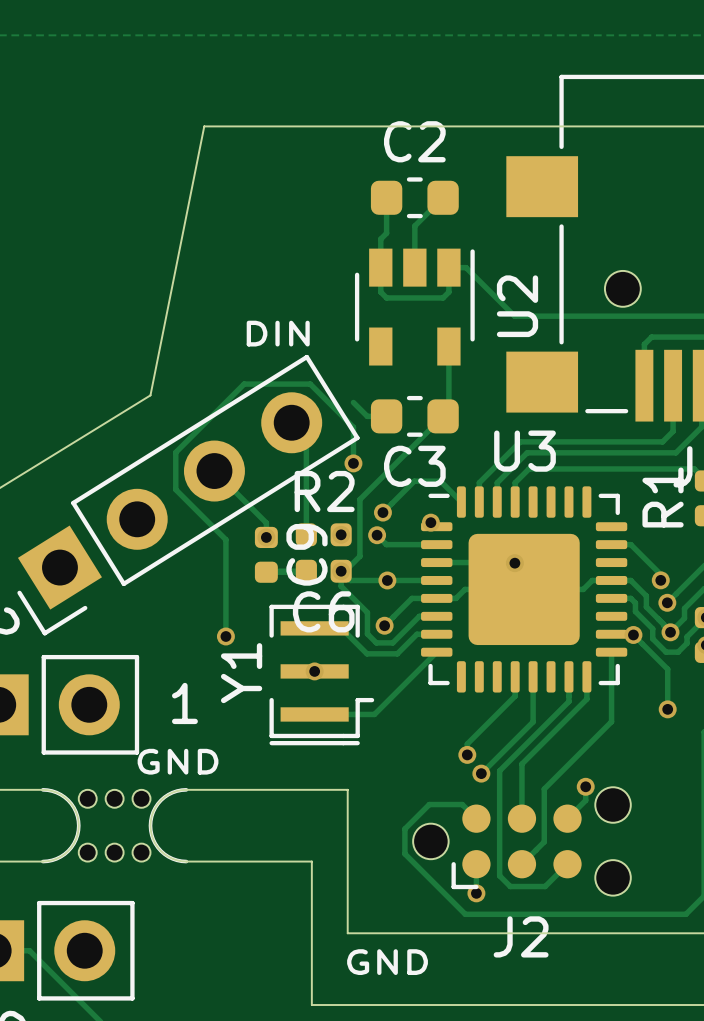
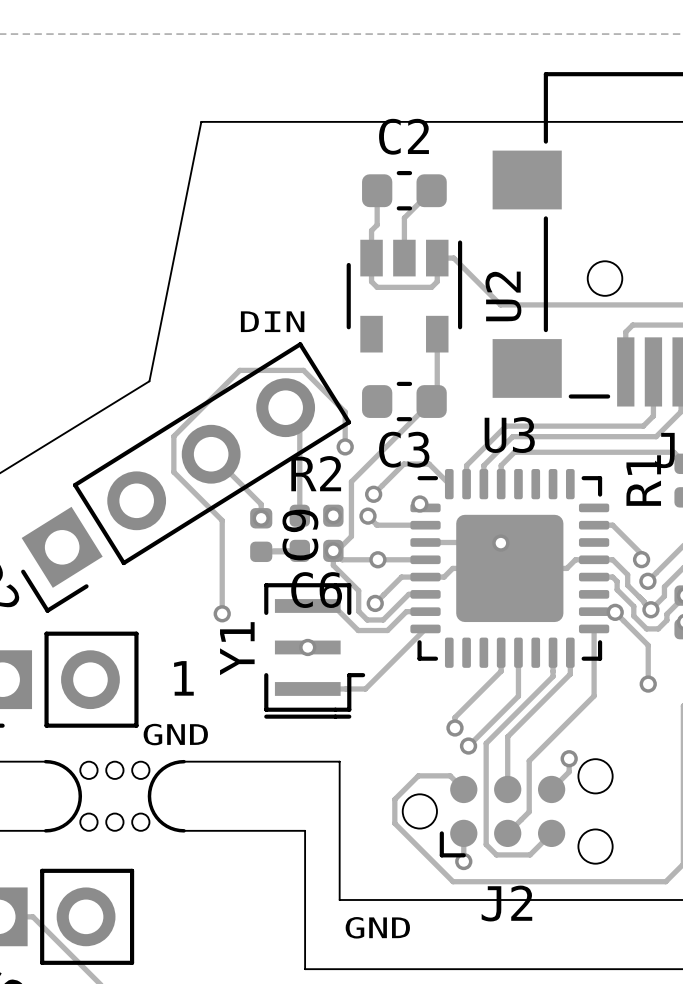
track: (353, 402) (367, 416) (386, 416) -> none

